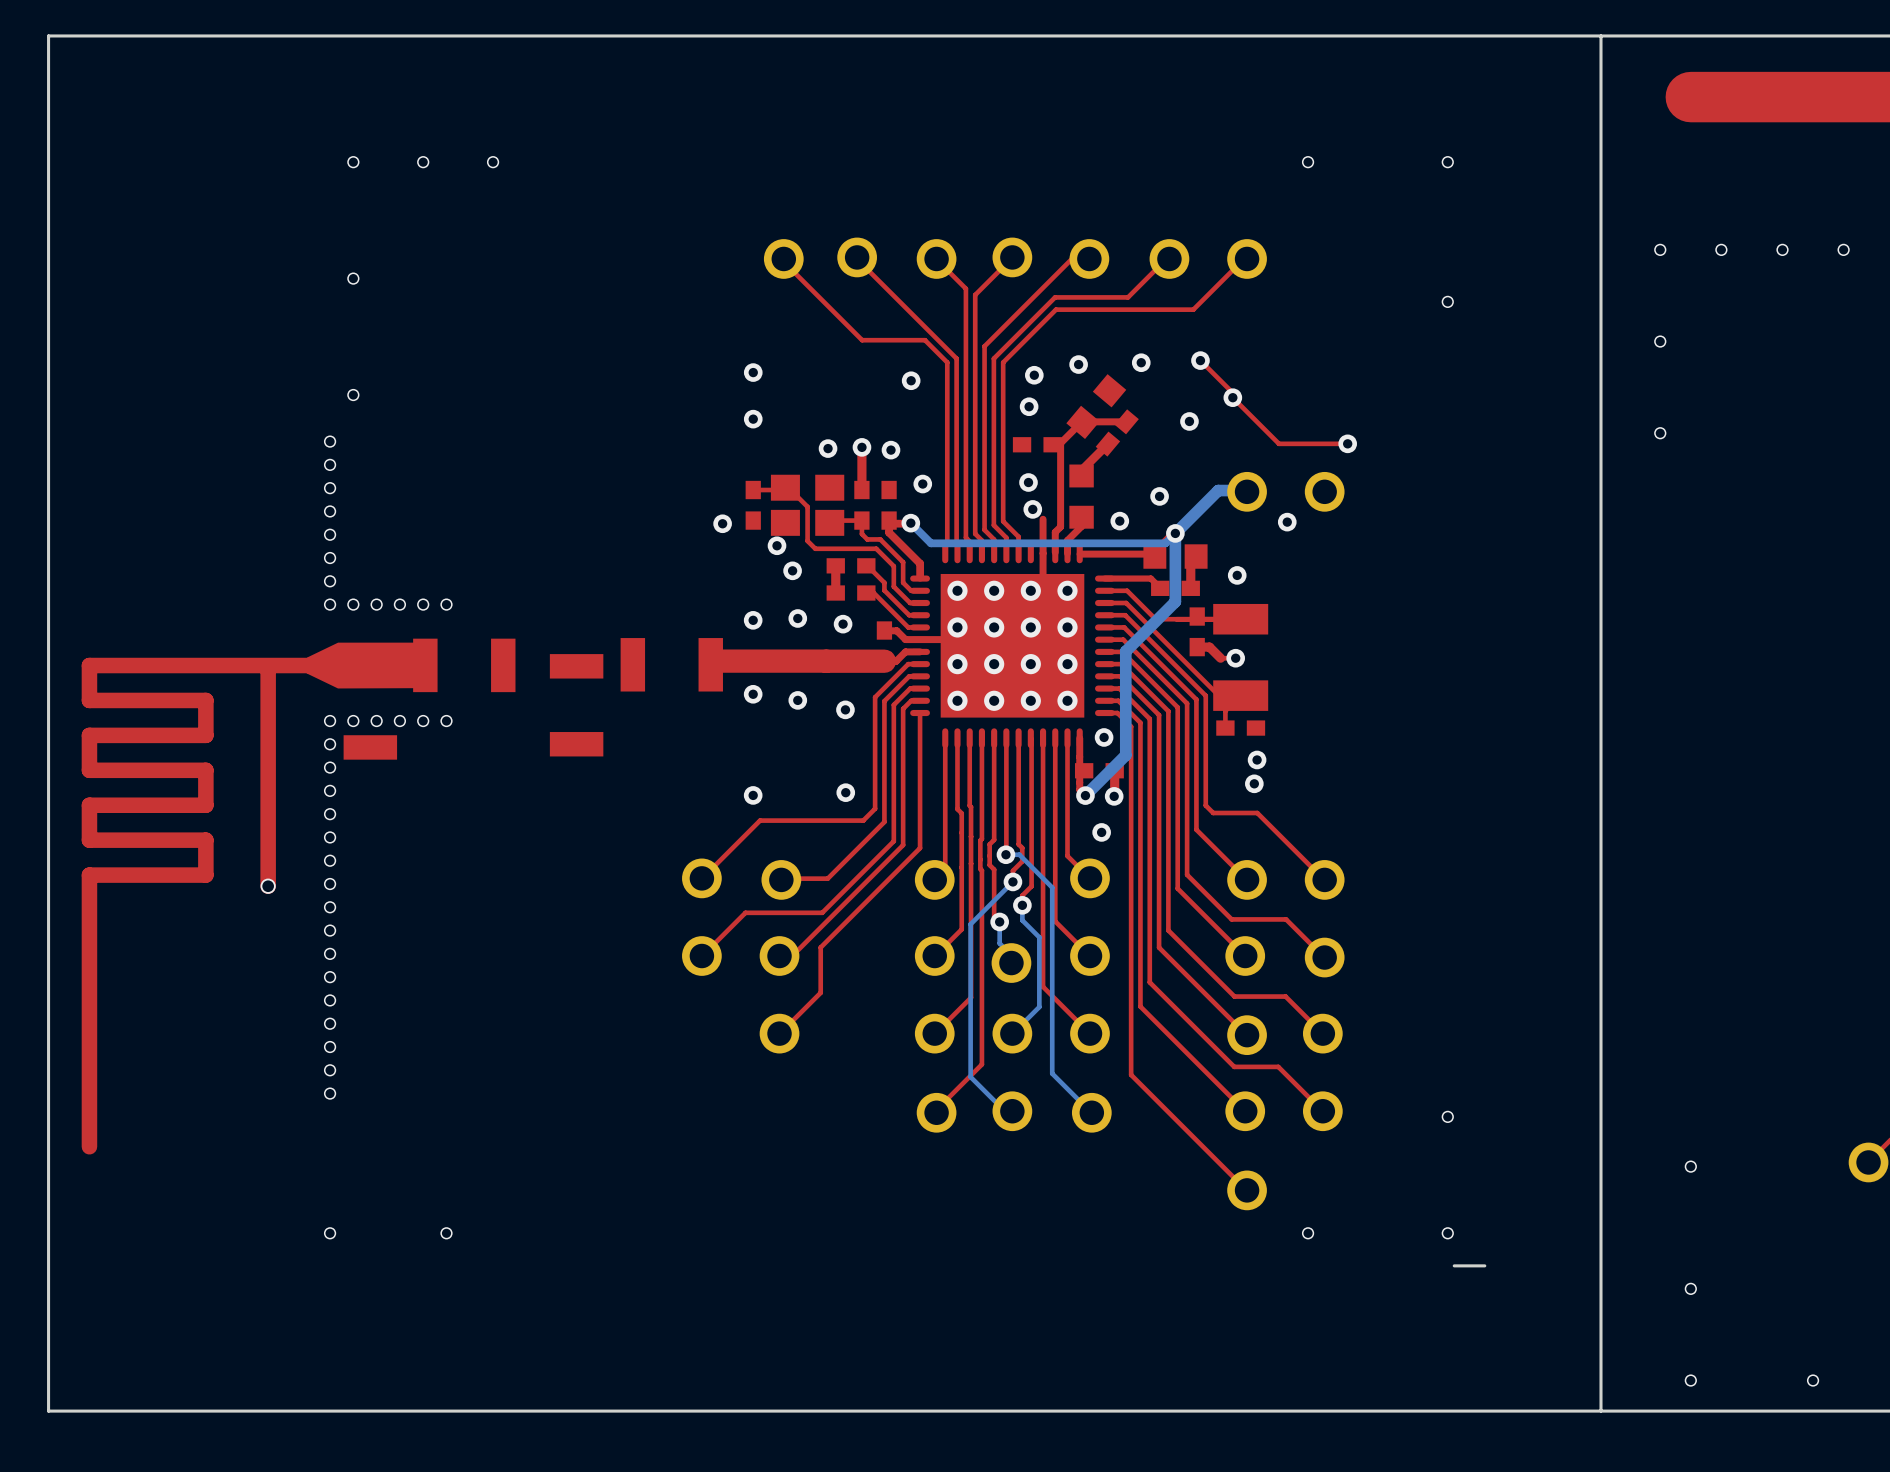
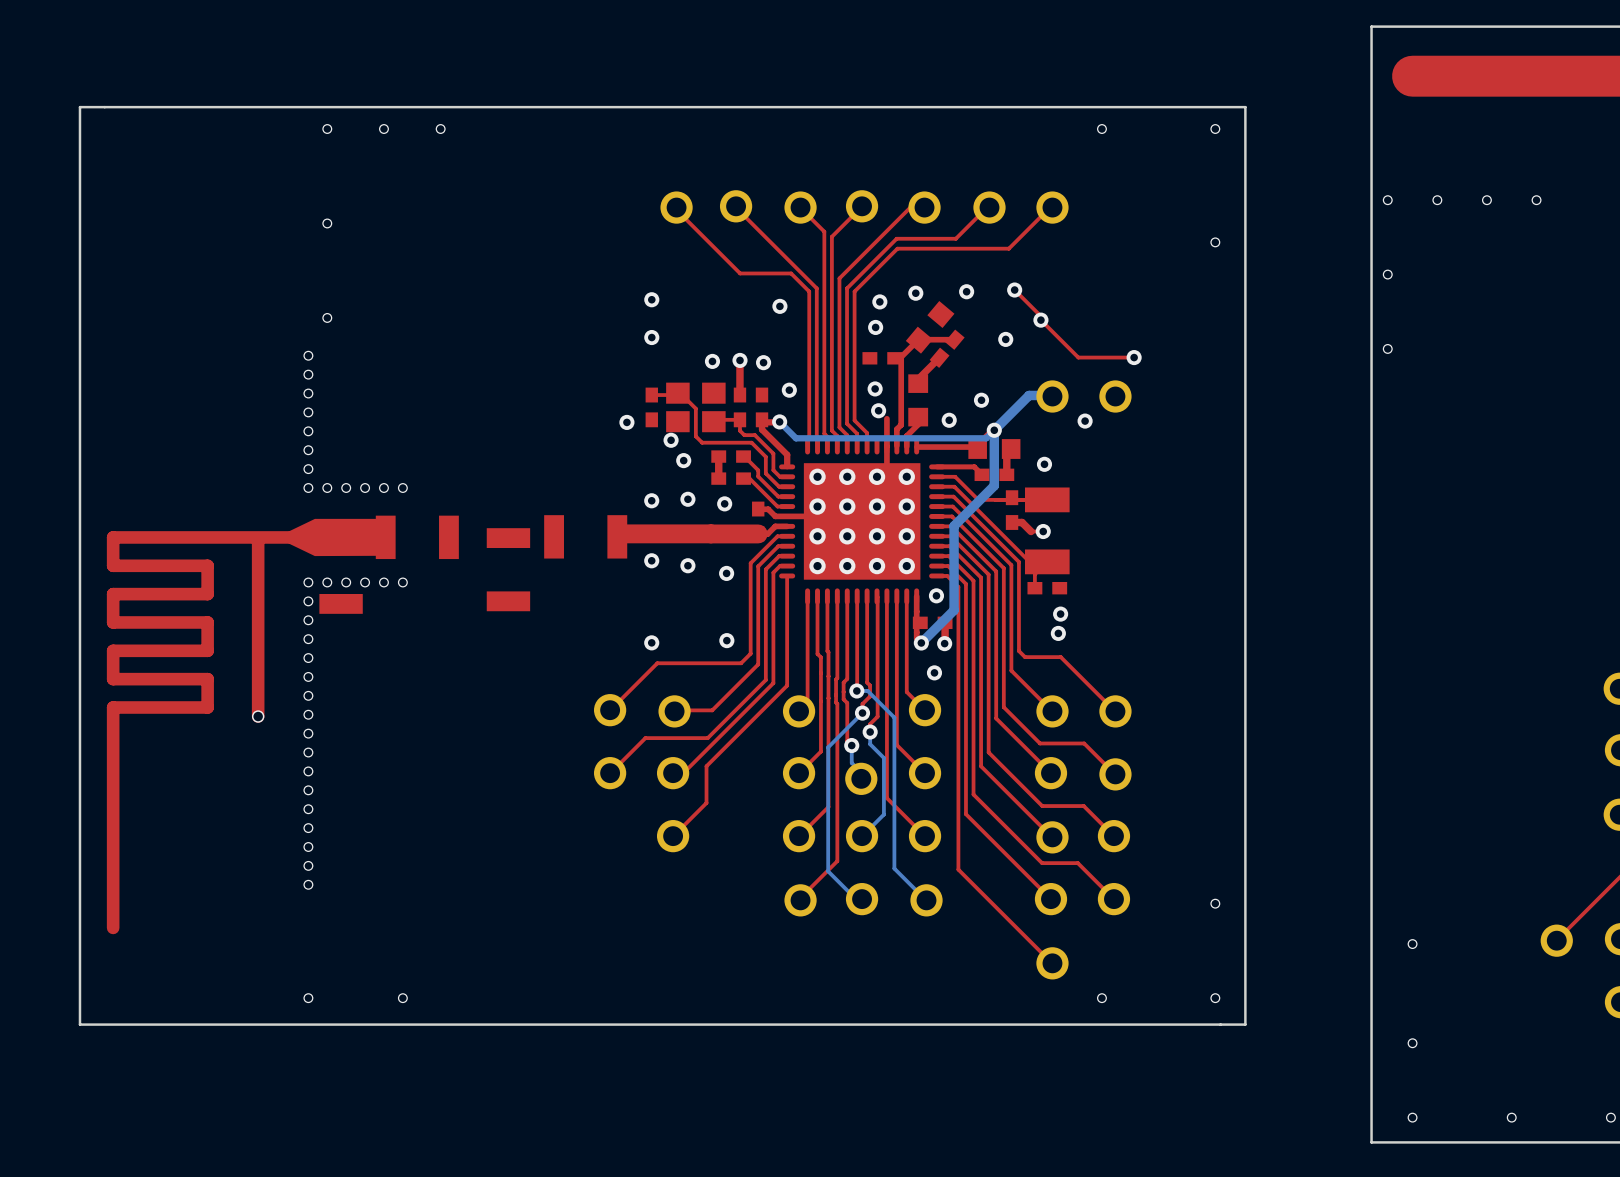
board edge: (1601, 35) (1601, 1411) -> (1371, 26) (1371, 1142)
board edge: (1640, 35) (48, 35) (48, 135) -> (1245, 1024) (1245, 107) (79, 107)
board edge: (48, 1265) (48, 1411) (1640, 1411) -> (79, 1024) (1220, 1024)

